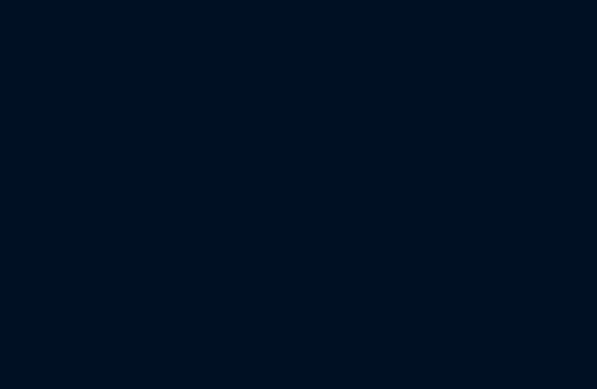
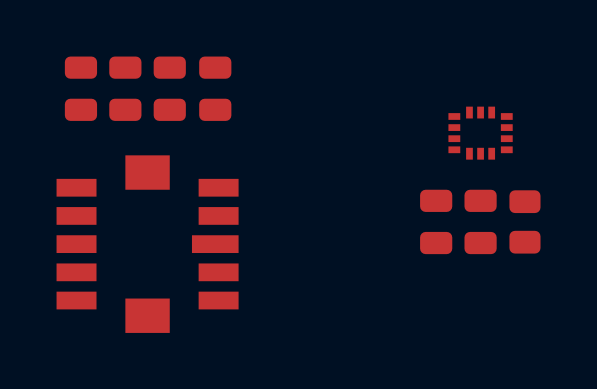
part: none -> (80, 88)
part: none -> (125, 88)
part: none -> (169, 88)
part: none -> (215, 88)
part: none -> (480, 133)
part: none -> (436, 221)
part: none -> (480, 221)
part: none -> (524, 221)
part: none -> (147, 244)

